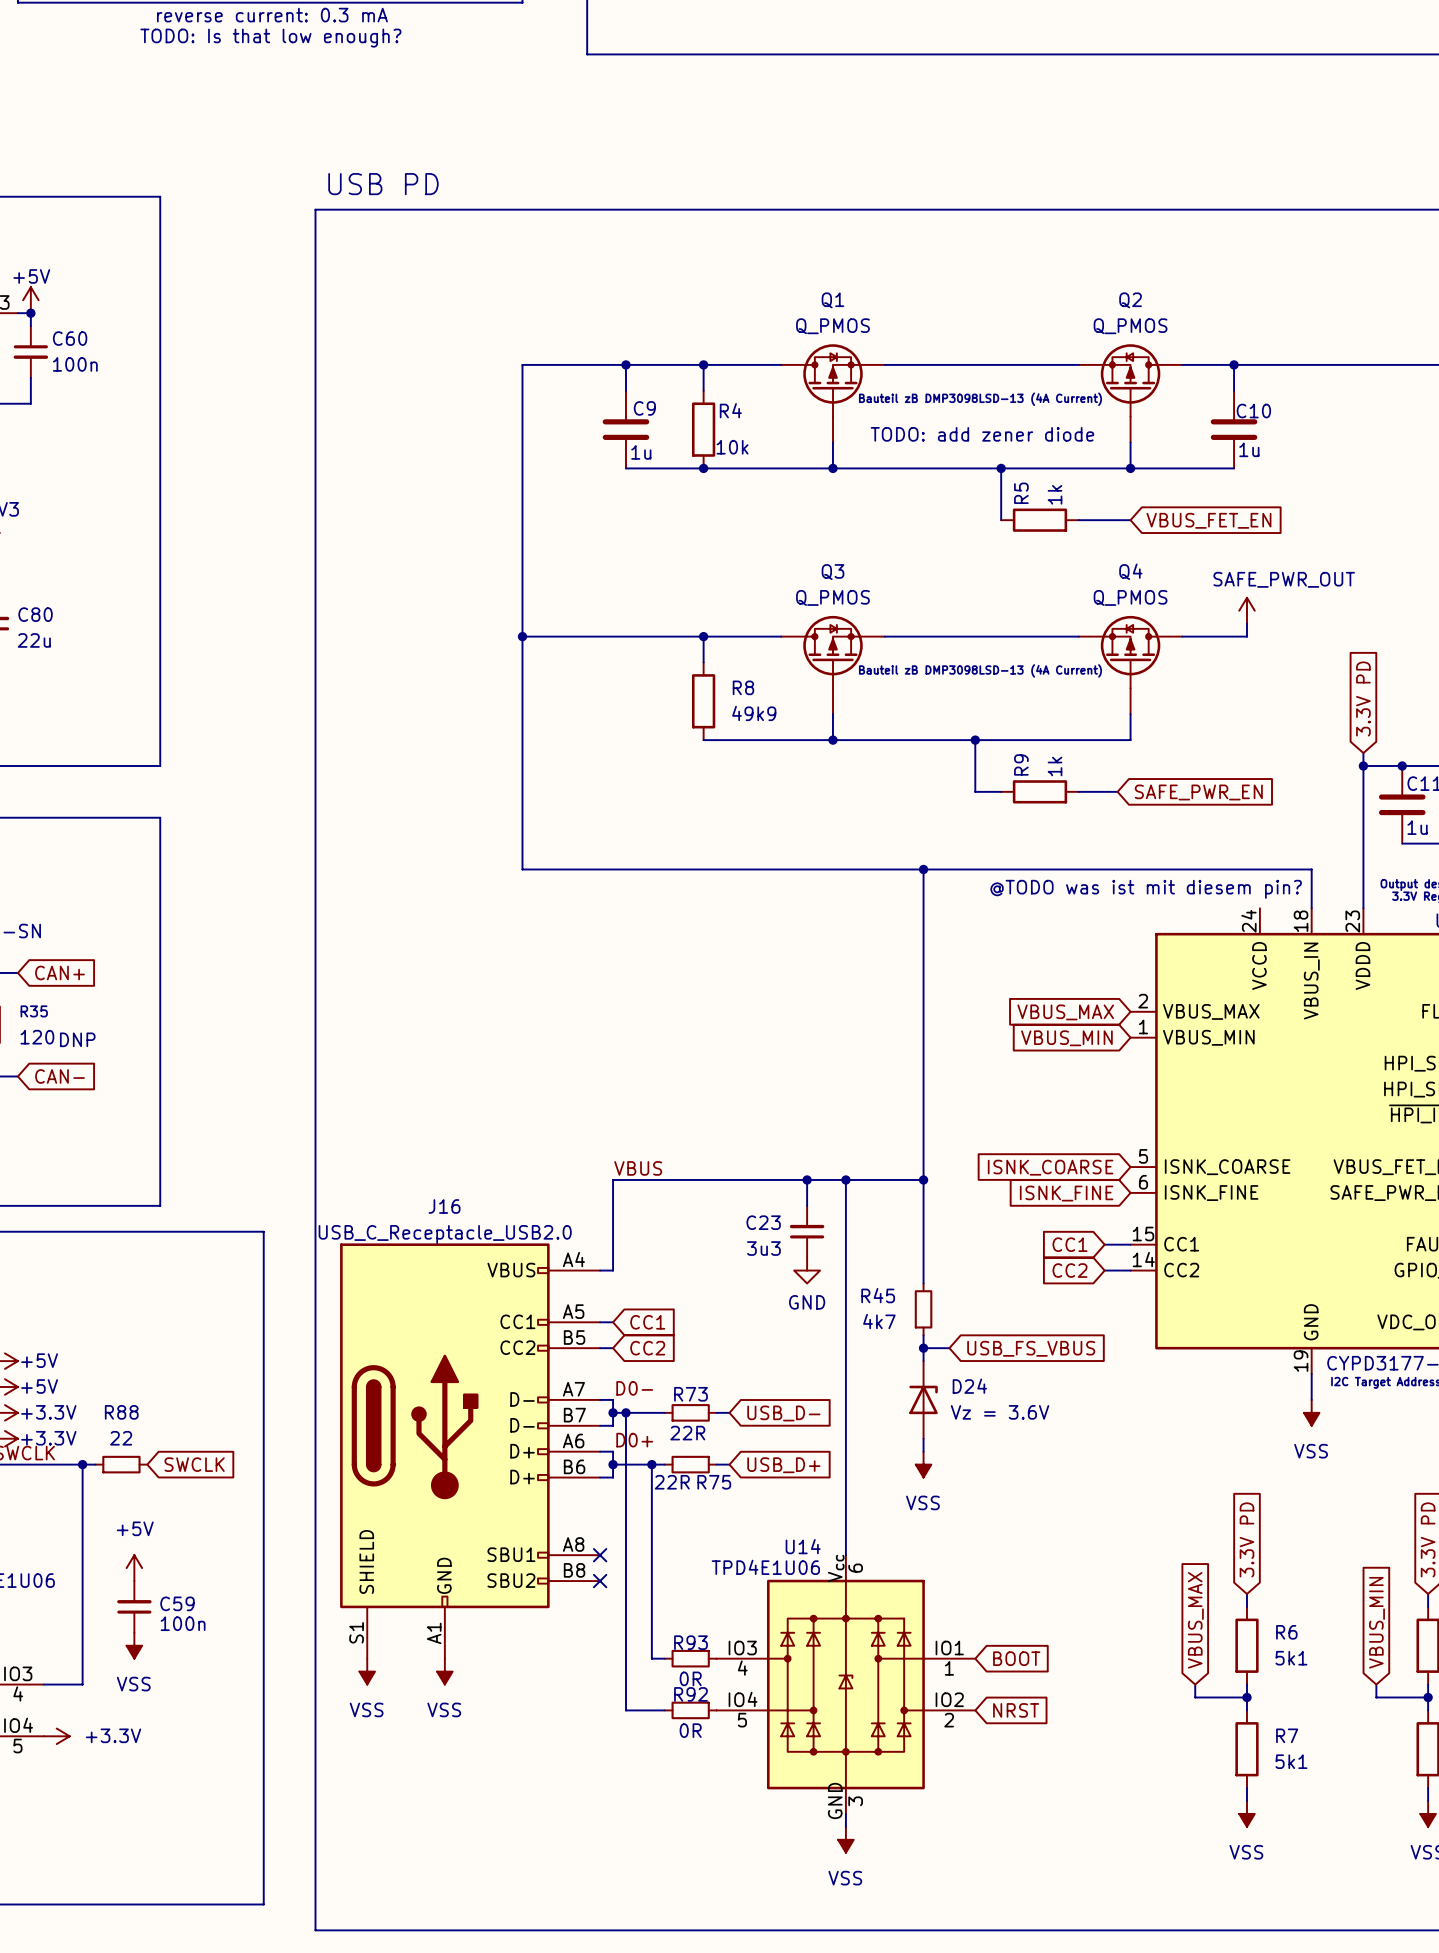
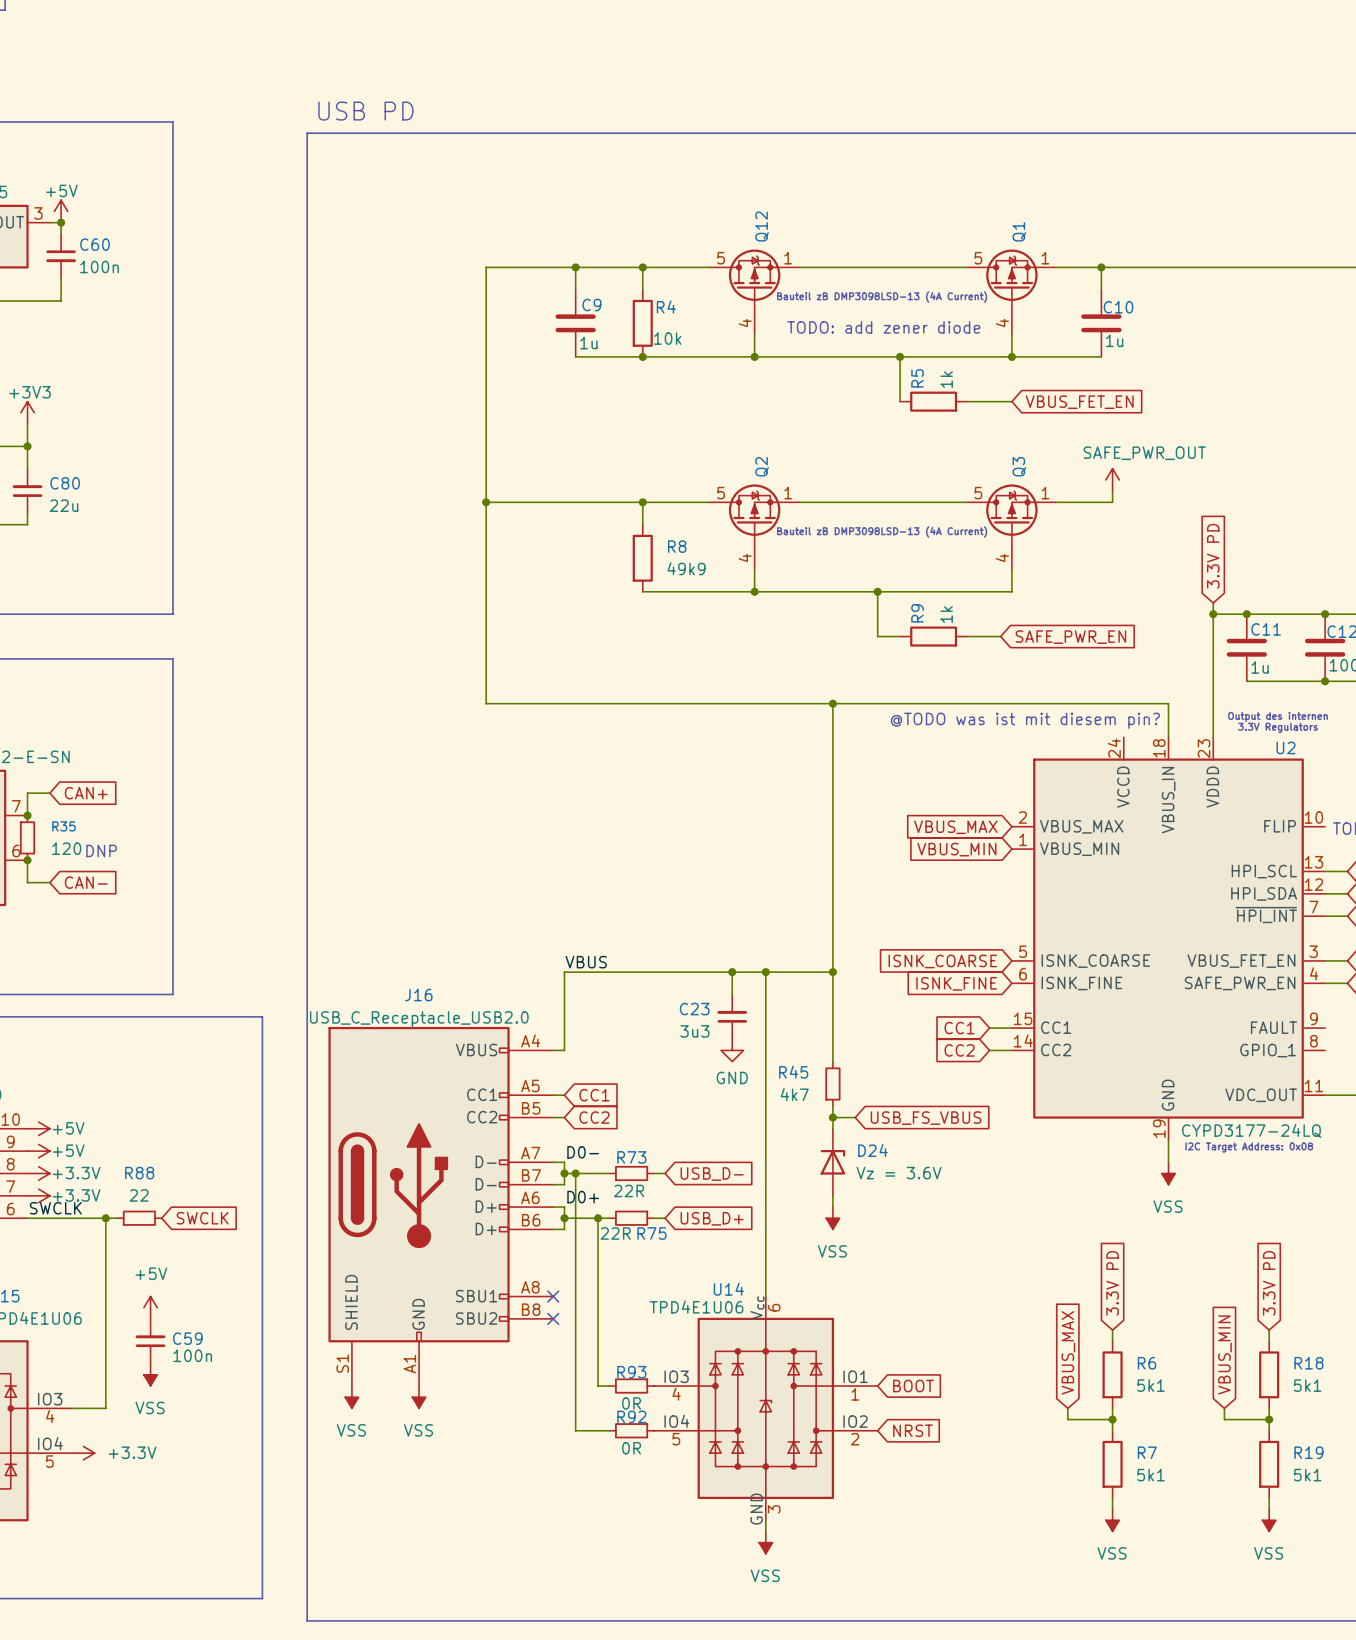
Q1 name position: Q1 (832, 300) -> Q1 (1019, 231)
Q2 name position: Q2 (1130, 300) -> Q2 (762, 466)
Q1 value: Q_PMOS (832, 326) -> none
Q2 value: Q_PMOS (1130, 326) -> none
Q1 symbol: [781, 344, 885, 443] -> [967, 249, 1057, 335]
Q2 symbol: [1078, 344, 1183, 443] -> [709, 484, 800, 570]
Q12: none -> (754, 292)
Q3 name position: Q3 (832, 572) -> Q3 (1019, 466)
Q3 value: Q_PMOS (832, 597) -> none
Q3 symbol: [781, 615, 885, 715] -> [967, 484, 1057, 570]
Q4: Q_PMOS (1130, 665) -> none

